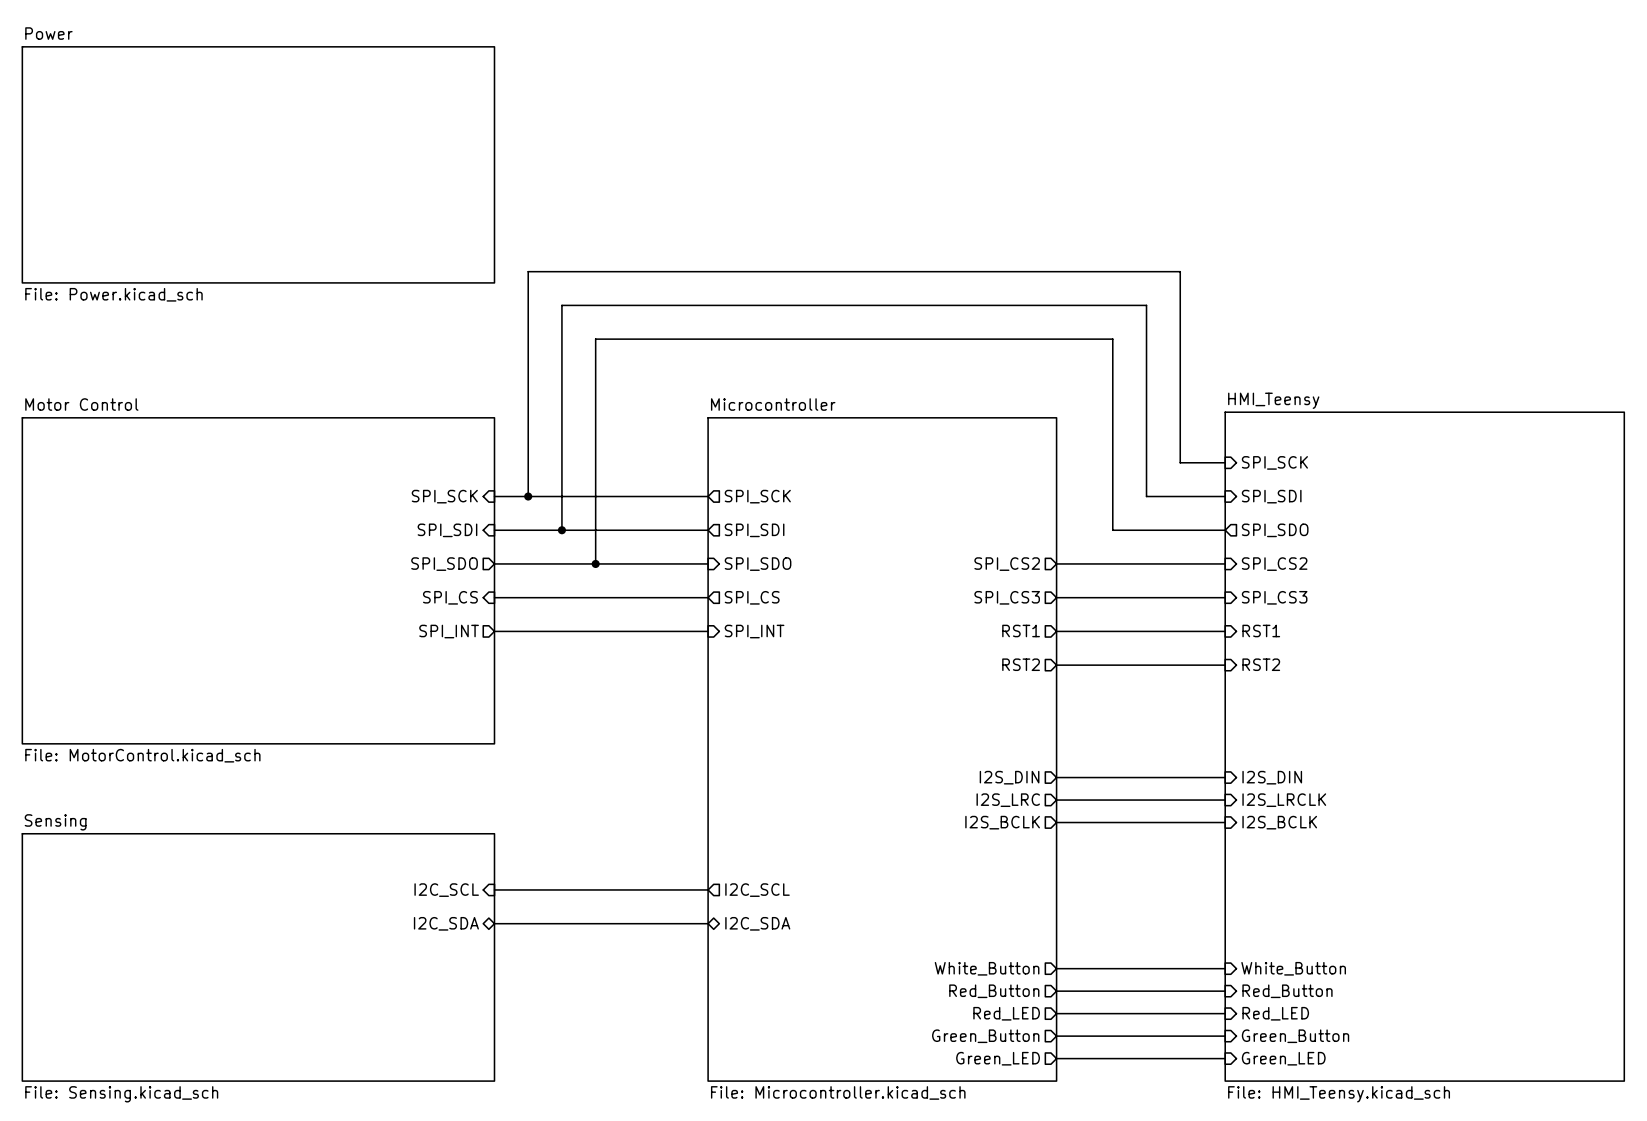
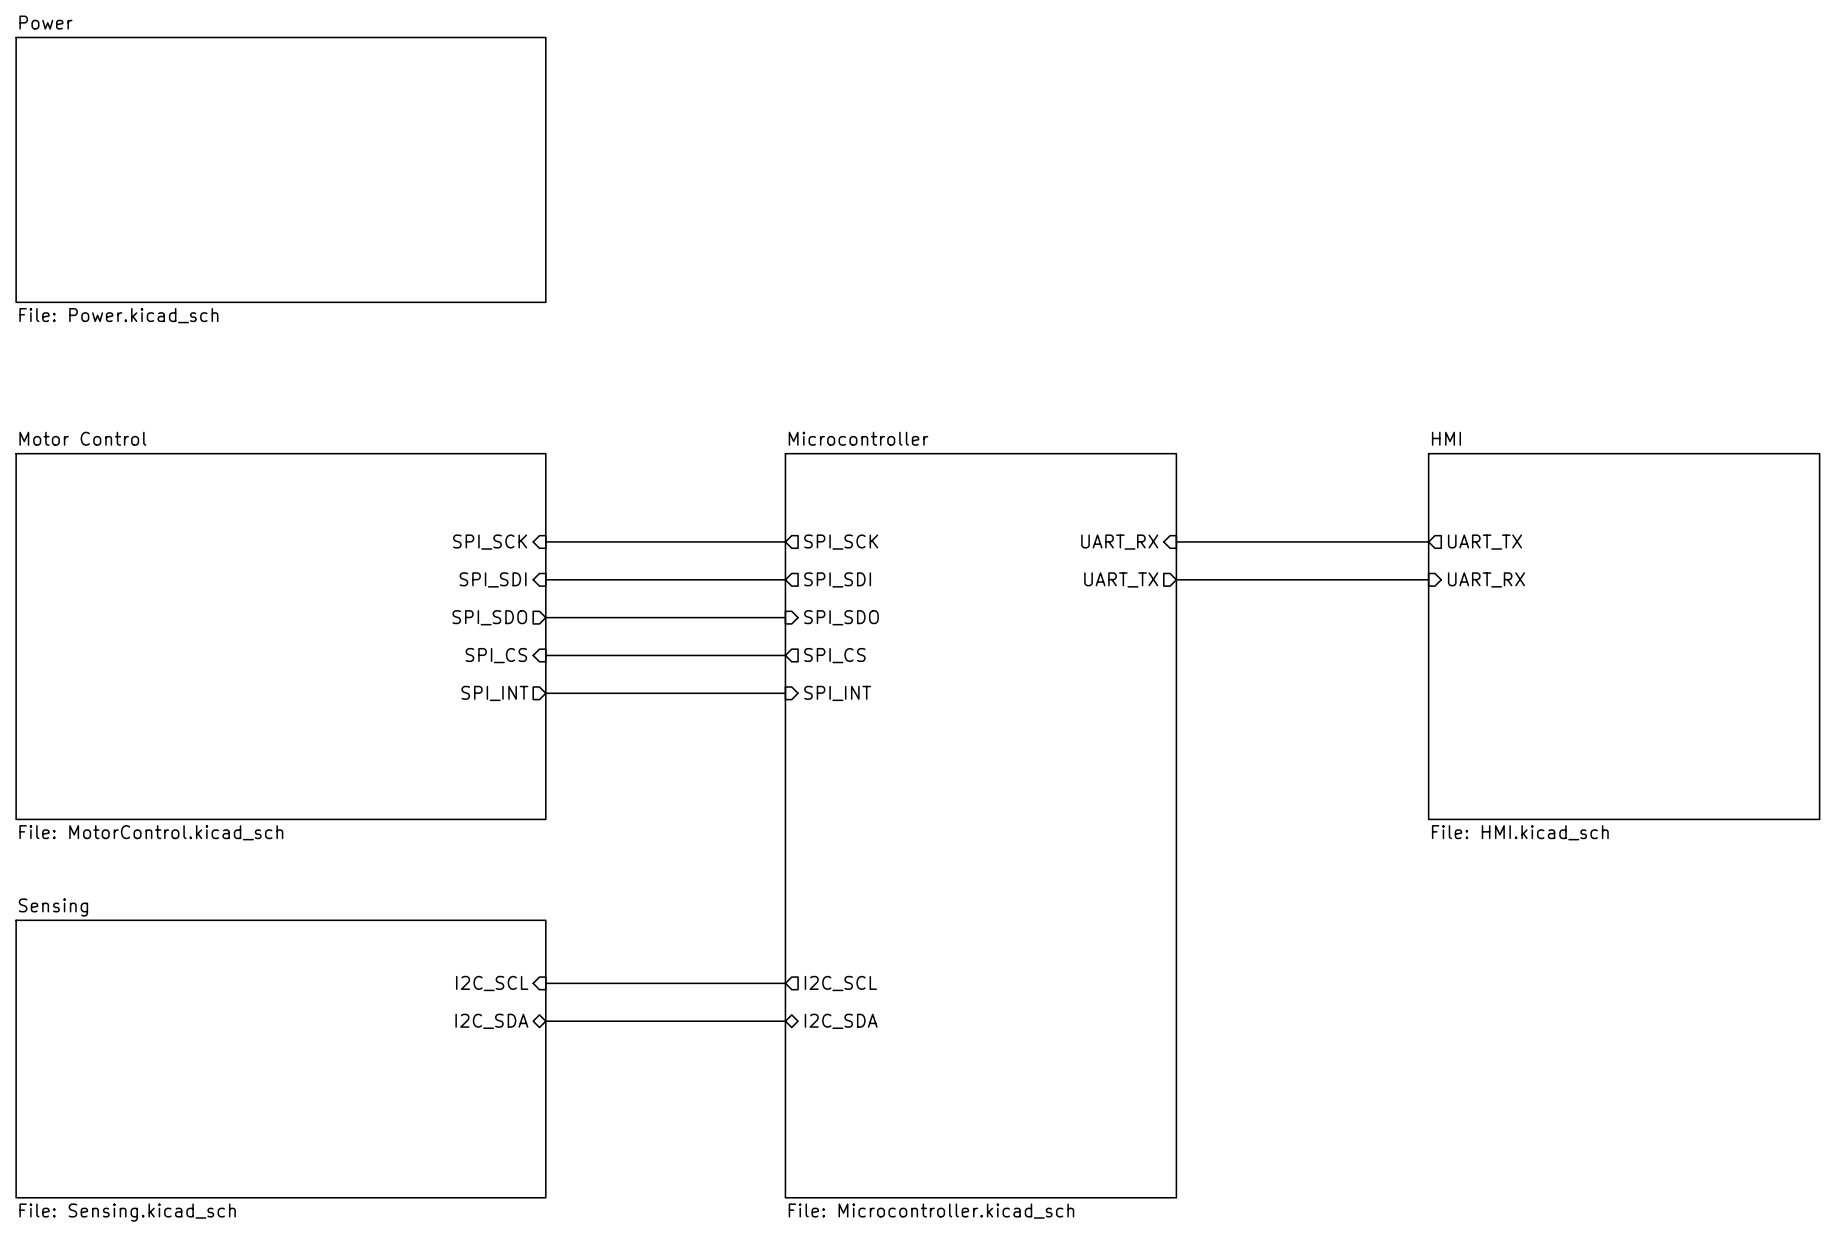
wire: (1225, 462) (1180, 462) (1180, 271) (528, 271) (528, 496) -> none
sheet pin: SPI_SCK (1274, 462) -> none
junction: (528, 496) -> none
sheet pin: none -> UART_RX (1119, 542)
wire: (1146, 496) (1146, 305) (561, 305) (561, 530) -> (1277, 541) (1176, 541)
wire: none -> (1365, 541) (1428, 541)
sheet pin: SPI_SDI (1271, 496) -> none
sheet pin: none -> UART_TX (1484, 542)
junction: (561, 530) -> none
sheet pin: none -> UART_TX (1121, 579)
wire: (1112, 530) (1112, 339) (595, 339) (595, 563) -> (1239, 579) (1176, 579)
wire: none -> (1365, 579) (1428, 579)
sheet pin: SPI_SDO (1275, 530) -> none
sheet pin: none -> UART_RX (1486, 579)
junction: (595, 563) -> none
wire: (1056, 563) (1225, 563) -> none
sheet pin: SPI_CS2 (1007, 564) -> none
sheet pin: SPI_CS2 (1274, 564) -> none
sheet HMI: none -> File: HMI.kicad_sch (1624, 636)
sheet pin: SPI_CS3 (1007, 597) -> none
wire: (1056, 597) (1225, 597) -> none
sheet pin: SPI_CS3 (1274, 597) -> none
sheet pin: RST1 (1021, 630) -> none
sheet pin: RST1 (1261, 630) -> none
wire: (1056, 631) (1225, 631) -> none
sheet pin: RST2 (1021, 664) -> none
sheet pin: RST2 (1261, 664) -> none
wire: (1056, 665) (1225, 665) -> none
sheet HMI_Teensy: File: HMI_Teensy.kicad_sch (1424, 746) -> none
sheet pin: I2S_DIN (1009, 777) -> none
wire: (1056, 777) (1225, 777) -> none
sheet pin: I2S_DIN (1272, 777) -> none
sheet pin: I2S_LRC (1008, 800) -> none
wire: (1056, 800) (1225, 800) -> none
sheet pin: I2S_LRCLK (1284, 800) -> none
sheet pin: I2S_BCLK (1002, 822) -> none
wire: (1056, 822) (1225, 822) -> none
sheet pin: I2S_BCLK (1279, 822) -> none
sheet pin: White_Button (987, 968) -> none
wire: (1056, 968) (1225, 968) -> none
sheet pin: White_Button (1293, 968) -> none
sheet pin: Red_Button (994, 991) -> none
wire: (1056, 991) (1225, 991) -> none
sheet pin: Red_Button (1287, 991) -> none
sheet pin: Red_LED (1006, 1013) -> none
wire: (1056, 1013) (1225, 1013) -> none
sheet pin: Red_LED (1275, 1013) -> none
sheet pin: Green_Button (985, 1036) -> none
wire: (1056, 1036) (1225, 1036) -> none
sheet pin: Green_Button (1295, 1036) -> none
sheet pin: Green_LED (998, 1058) -> none
wire: (1056, 1058) (1225, 1058) -> none
sheet pin: Green_LED (1283, 1058) -> none

